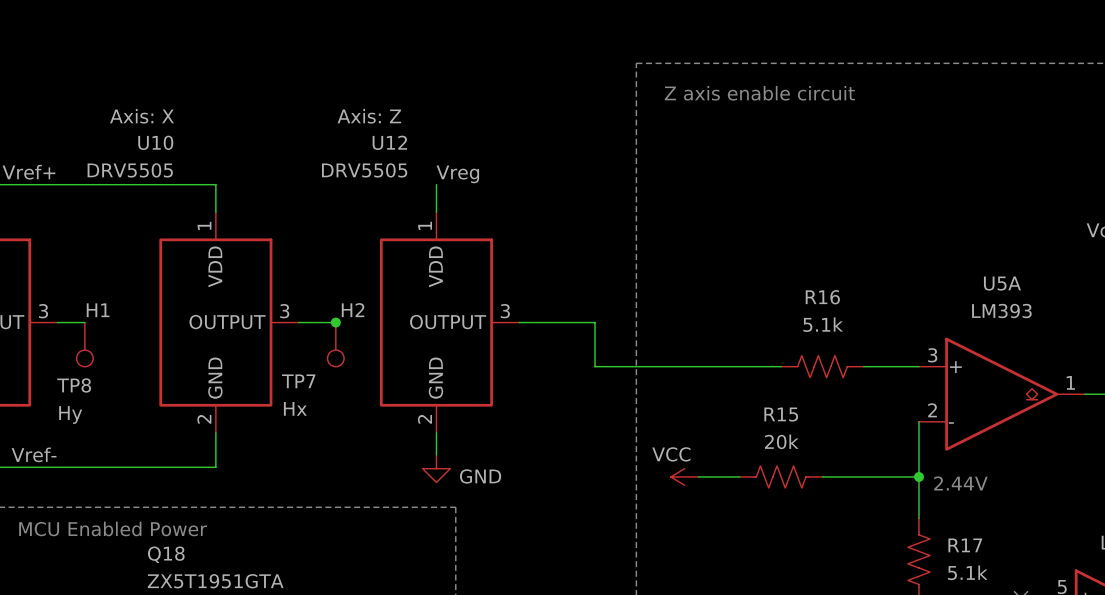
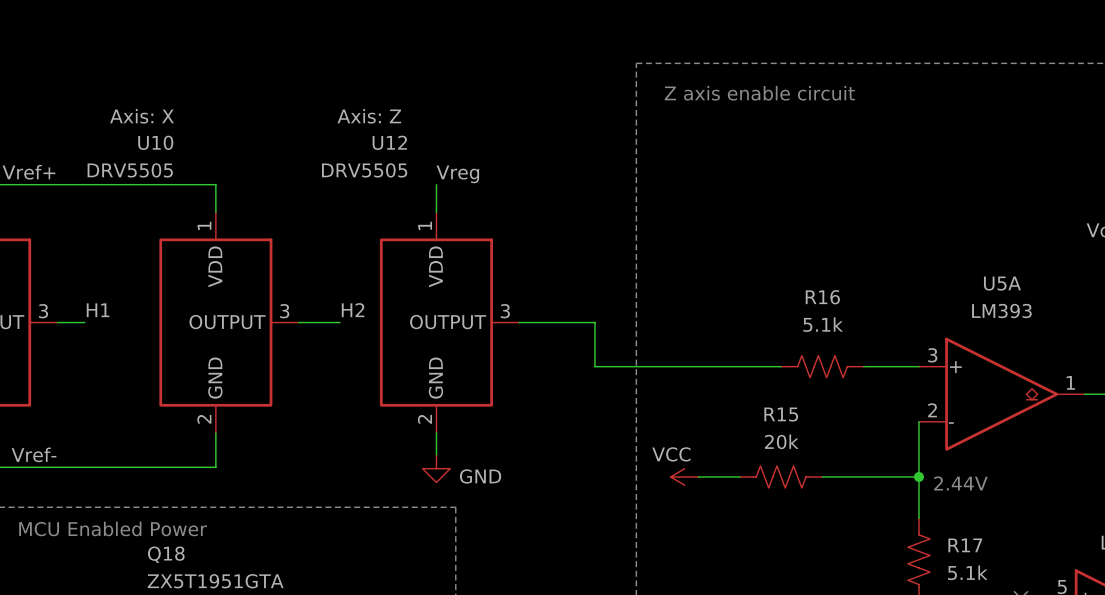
junction: (335, 322) -> none
TP8: Hy (84, 344) -> none
TP7: Hx (335, 344) -> none

